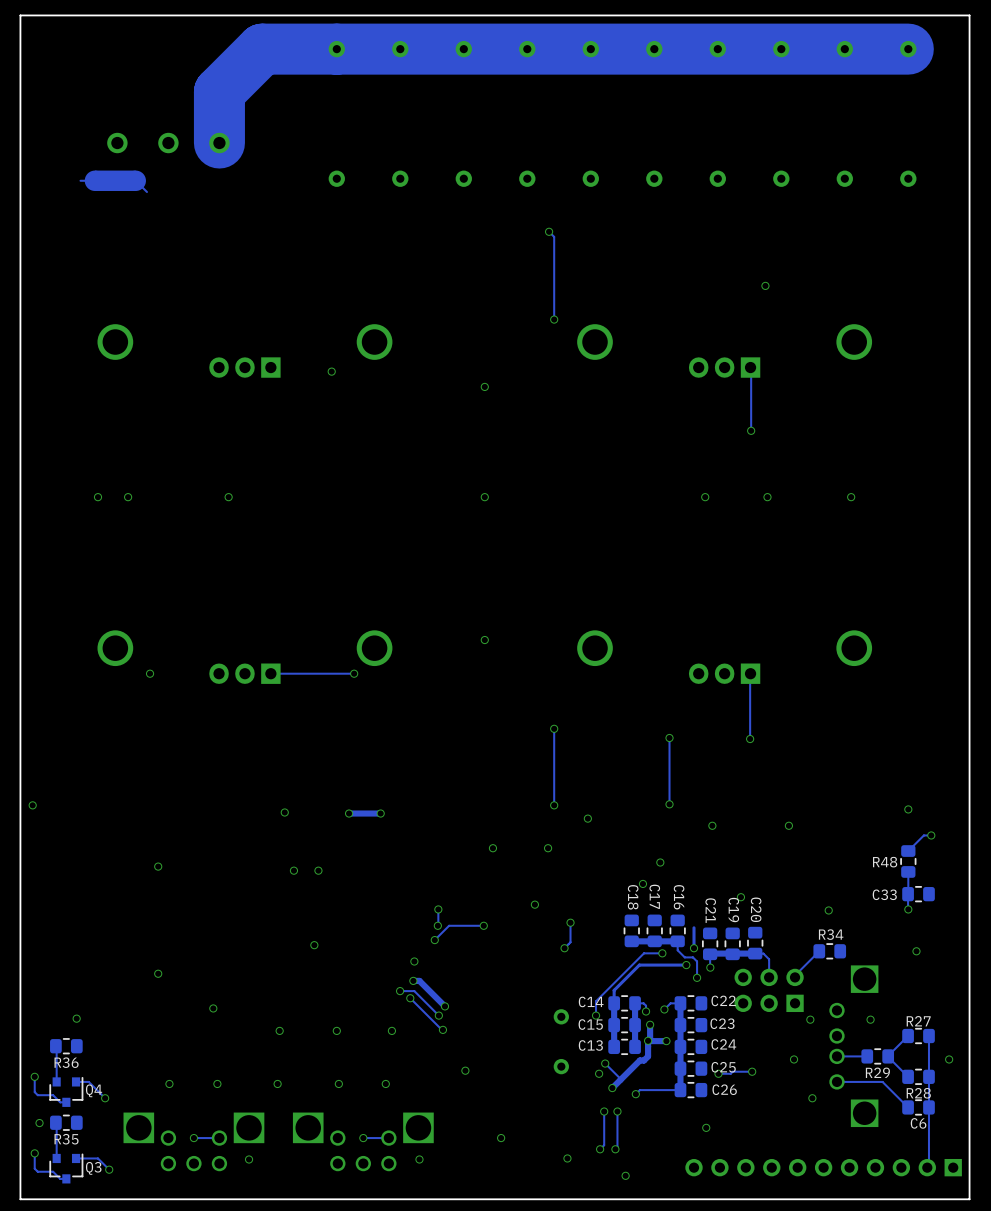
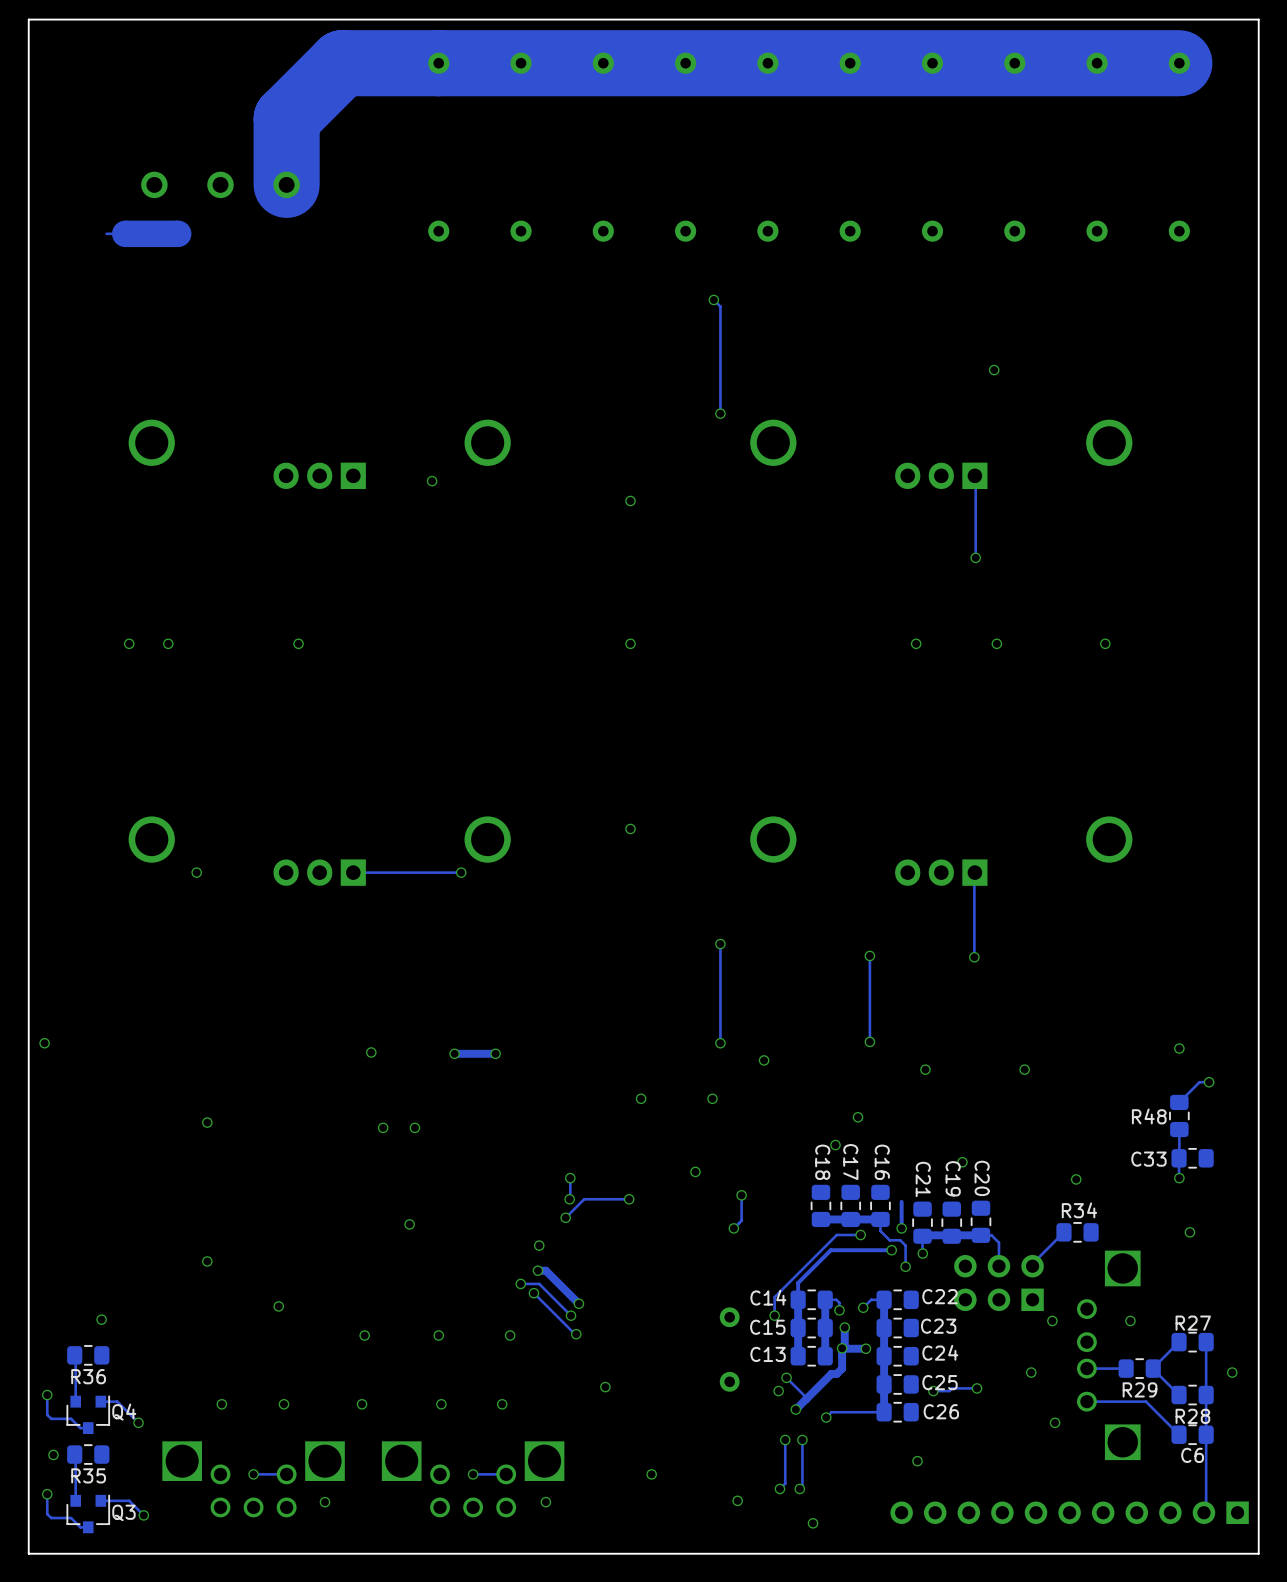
track: (135, 180) (146, 192) -> none

